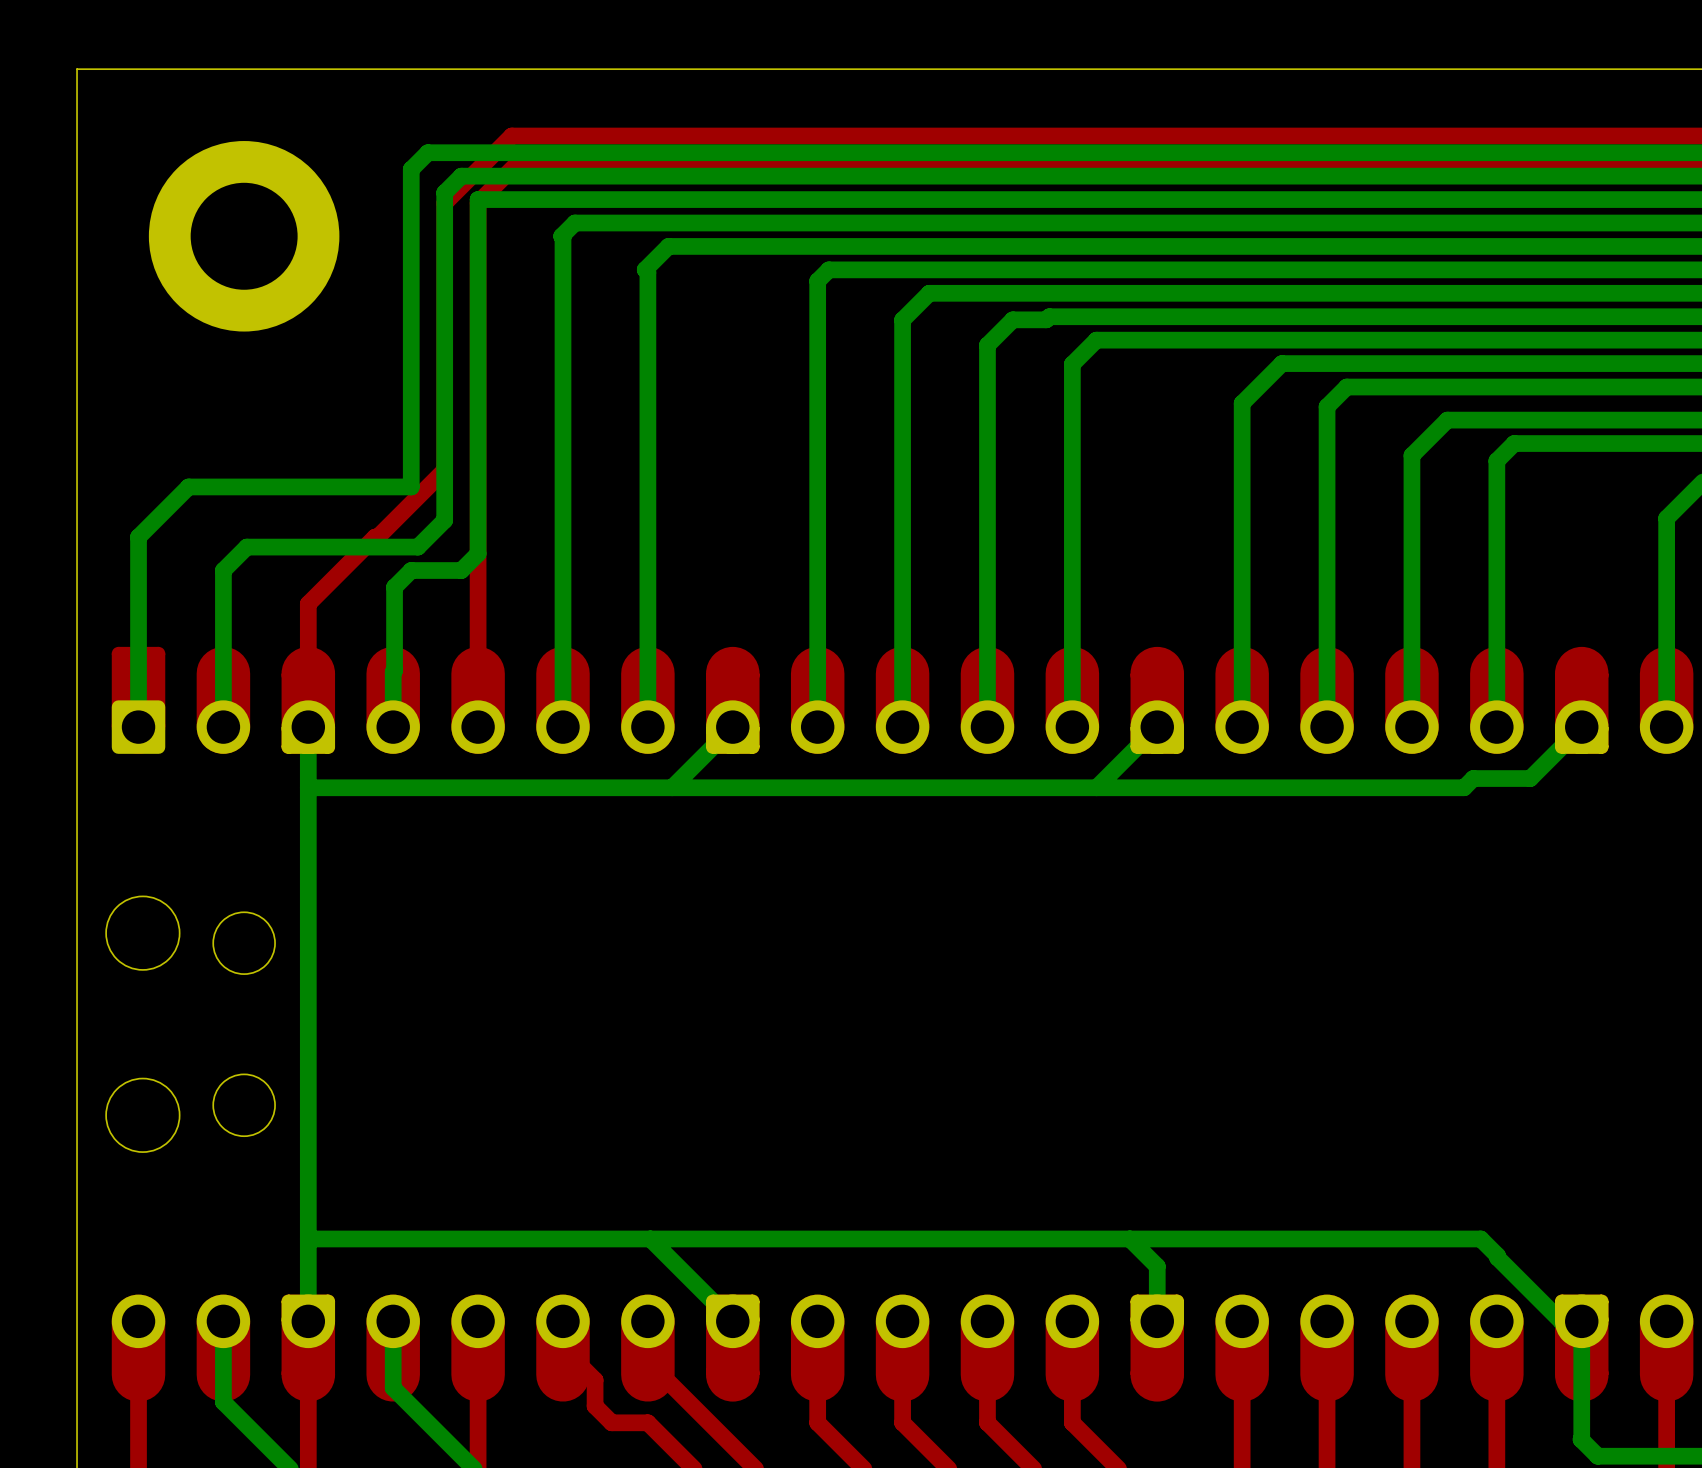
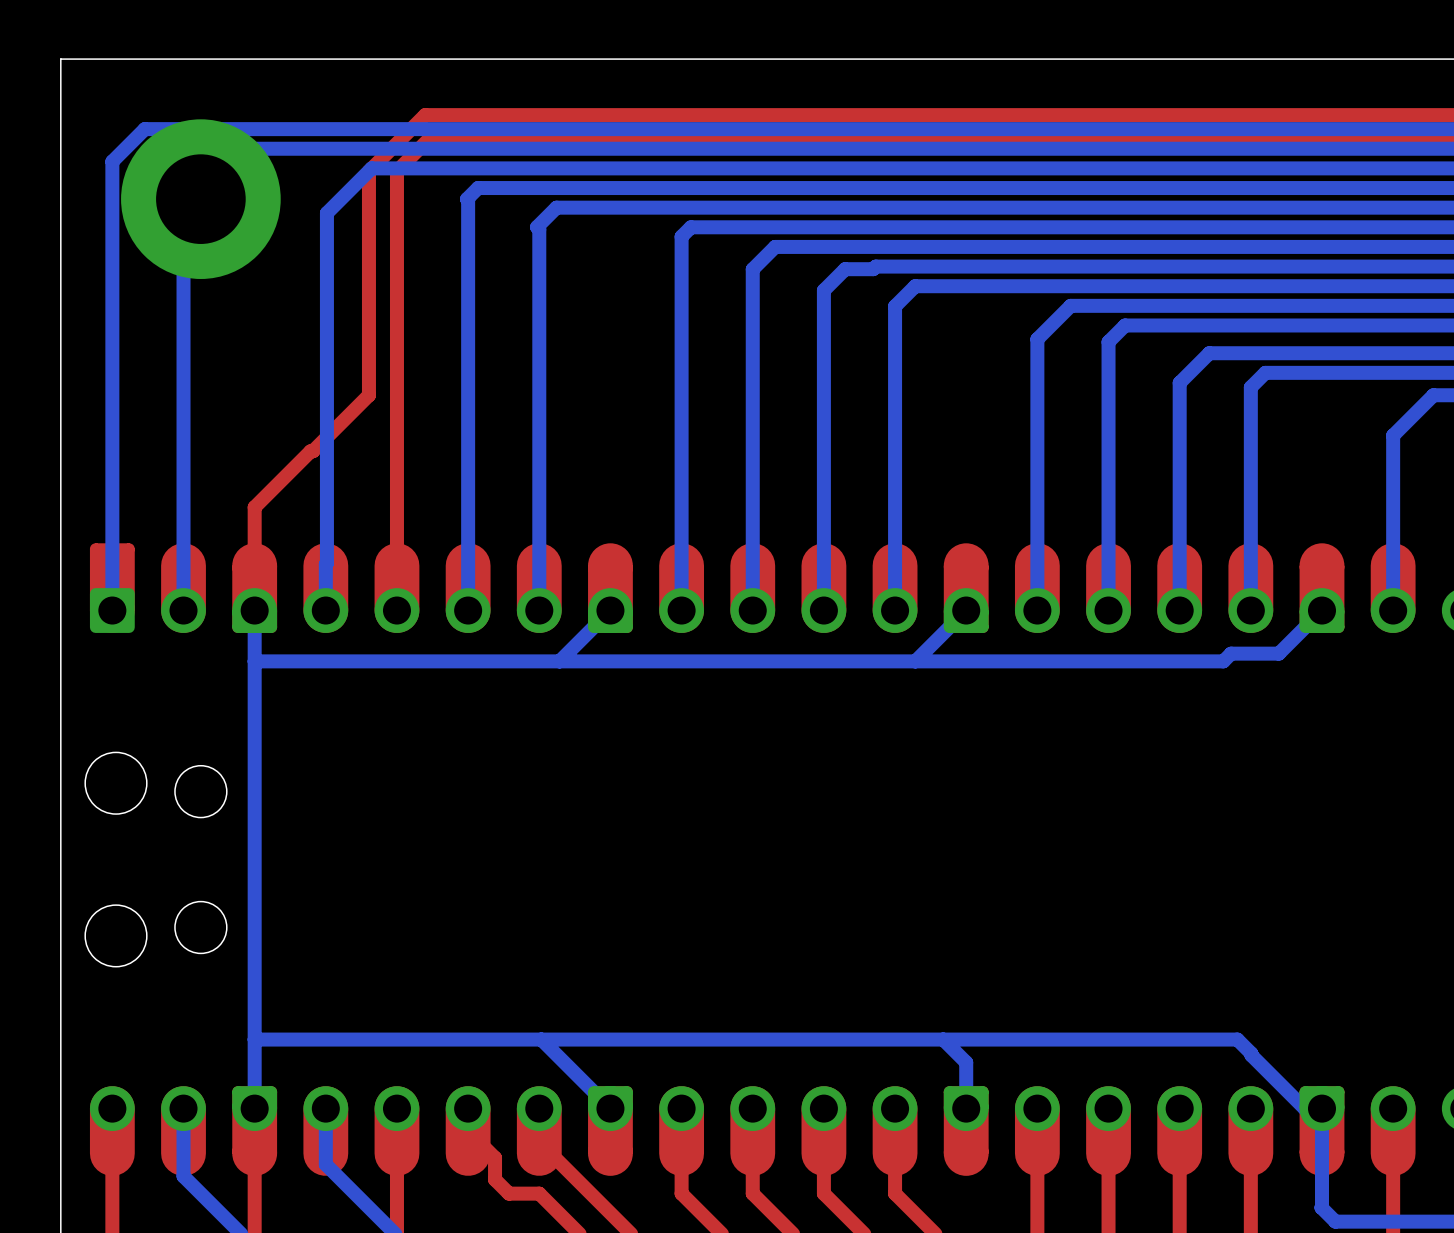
bottom track: (427, 152) (411, 169) (411, 486) (188, 486) (138, 537) -> (354, 129) (144, 129) (112, 161) (112, 451)
bottom track: (461, 176) (444, 192) (444, 520) (417, 547) (246, 547) (223, 570) -> (382, 148) (209, 148) (183, 174) (183, 479)
bottom track: (478, 199) (478, 553) (461, 570) (411, 570) (394, 587) -> (396, 168) (371, 168) (326, 213) (326, 493)

